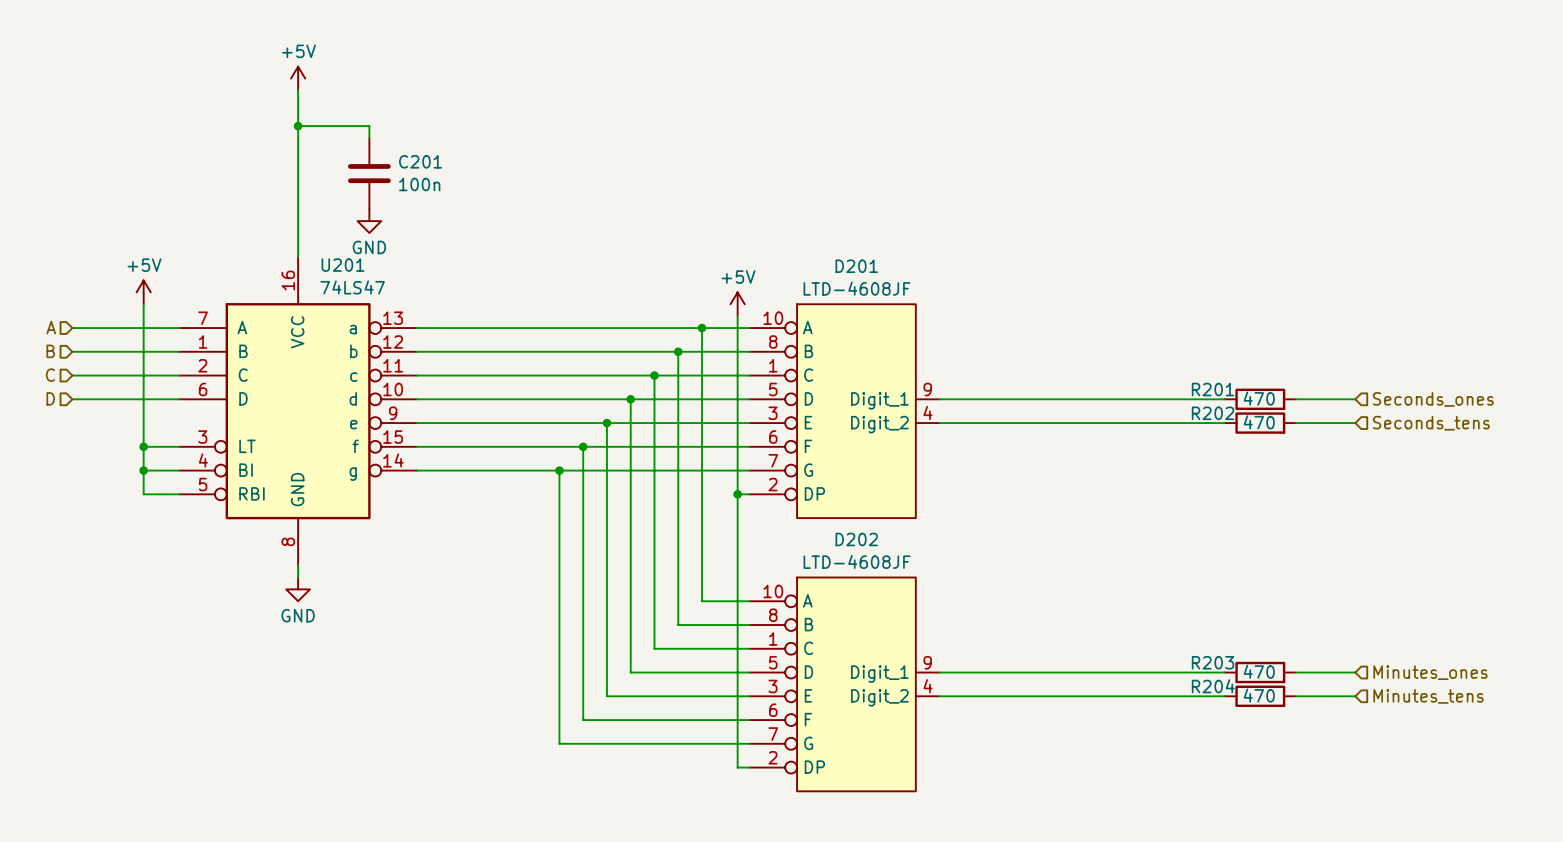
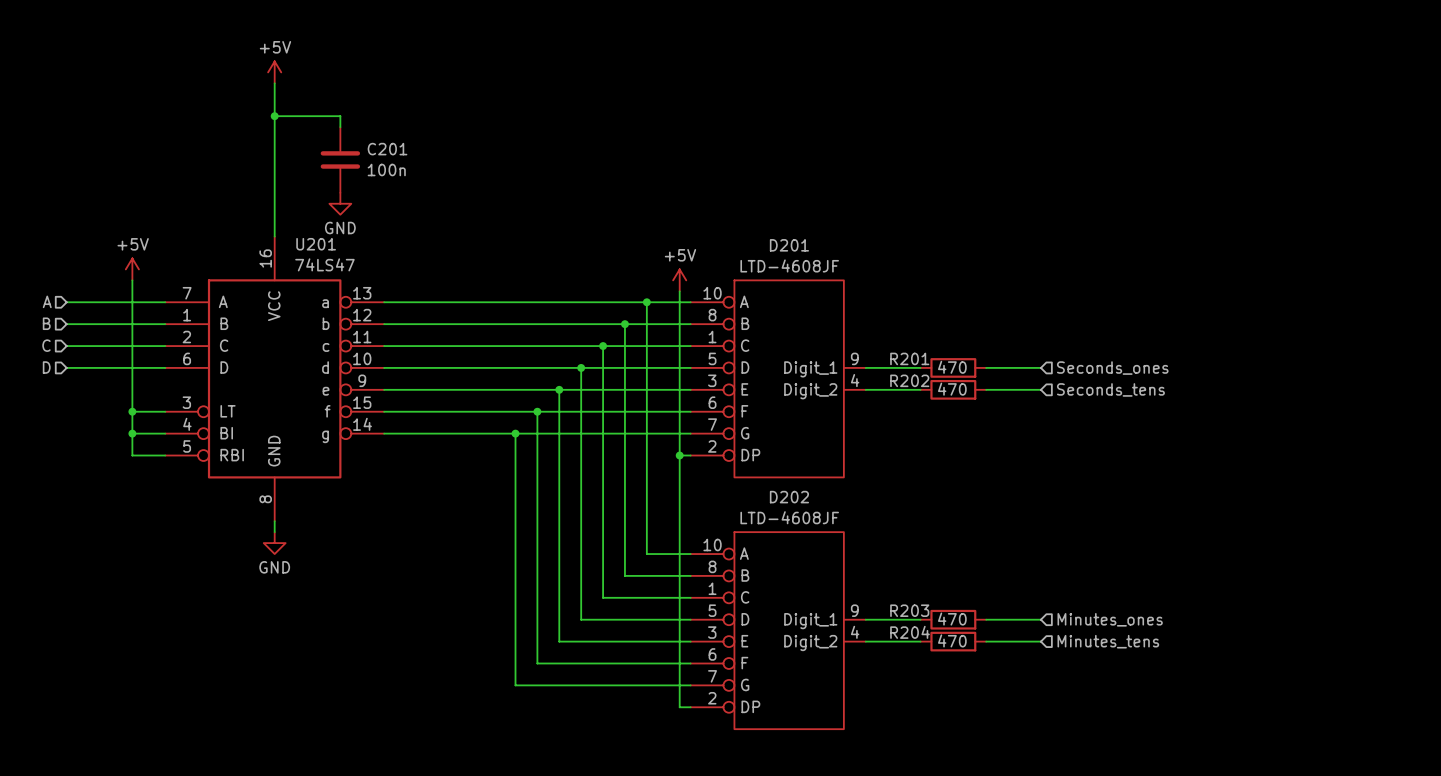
wire: (998, 399) (1070, 399) -> none
wire: (1129, 399) (1224, 399) -> none
R201 position: (1260, 399) -> (953, 367)
wire: (1295, 399) (1355, 399) -> none
hierarchical label position: Seconds_ones (1433, 399) -> Seconds_ones (1112, 368)
wire: (998, 423) (1070, 423) -> none
wire: (1129, 423) (1224, 423) -> none
R202 position: (1260, 423) -> (953, 389)
wire: (1295, 423) (1355, 423) -> none
hierarchical label position: Seconds_tens (1431, 423) -> Seconds_tens (1110, 389)
wire: (998, 672) (1070, 672) -> none
wire: (1129, 672) (1224, 672) -> none
R203 position: (1260, 672) -> (953, 619)
wire: (1295, 672) (1355, 672) -> none
hierarchical label position: Minutes_ones (1430, 672) -> Minutes_ones (1110, 619)
wire: (998, 696) (1070, 696) -> none
wire: (1129, 696) (1224, 696) -> none
R204 position: (1260, 696) -> (953, 641)
wire: (1295, 696) (1355, 696) -> none
hierarchical label position: Minutes_tens (1428, 696) -> Minutes_tens (1108, 641)

